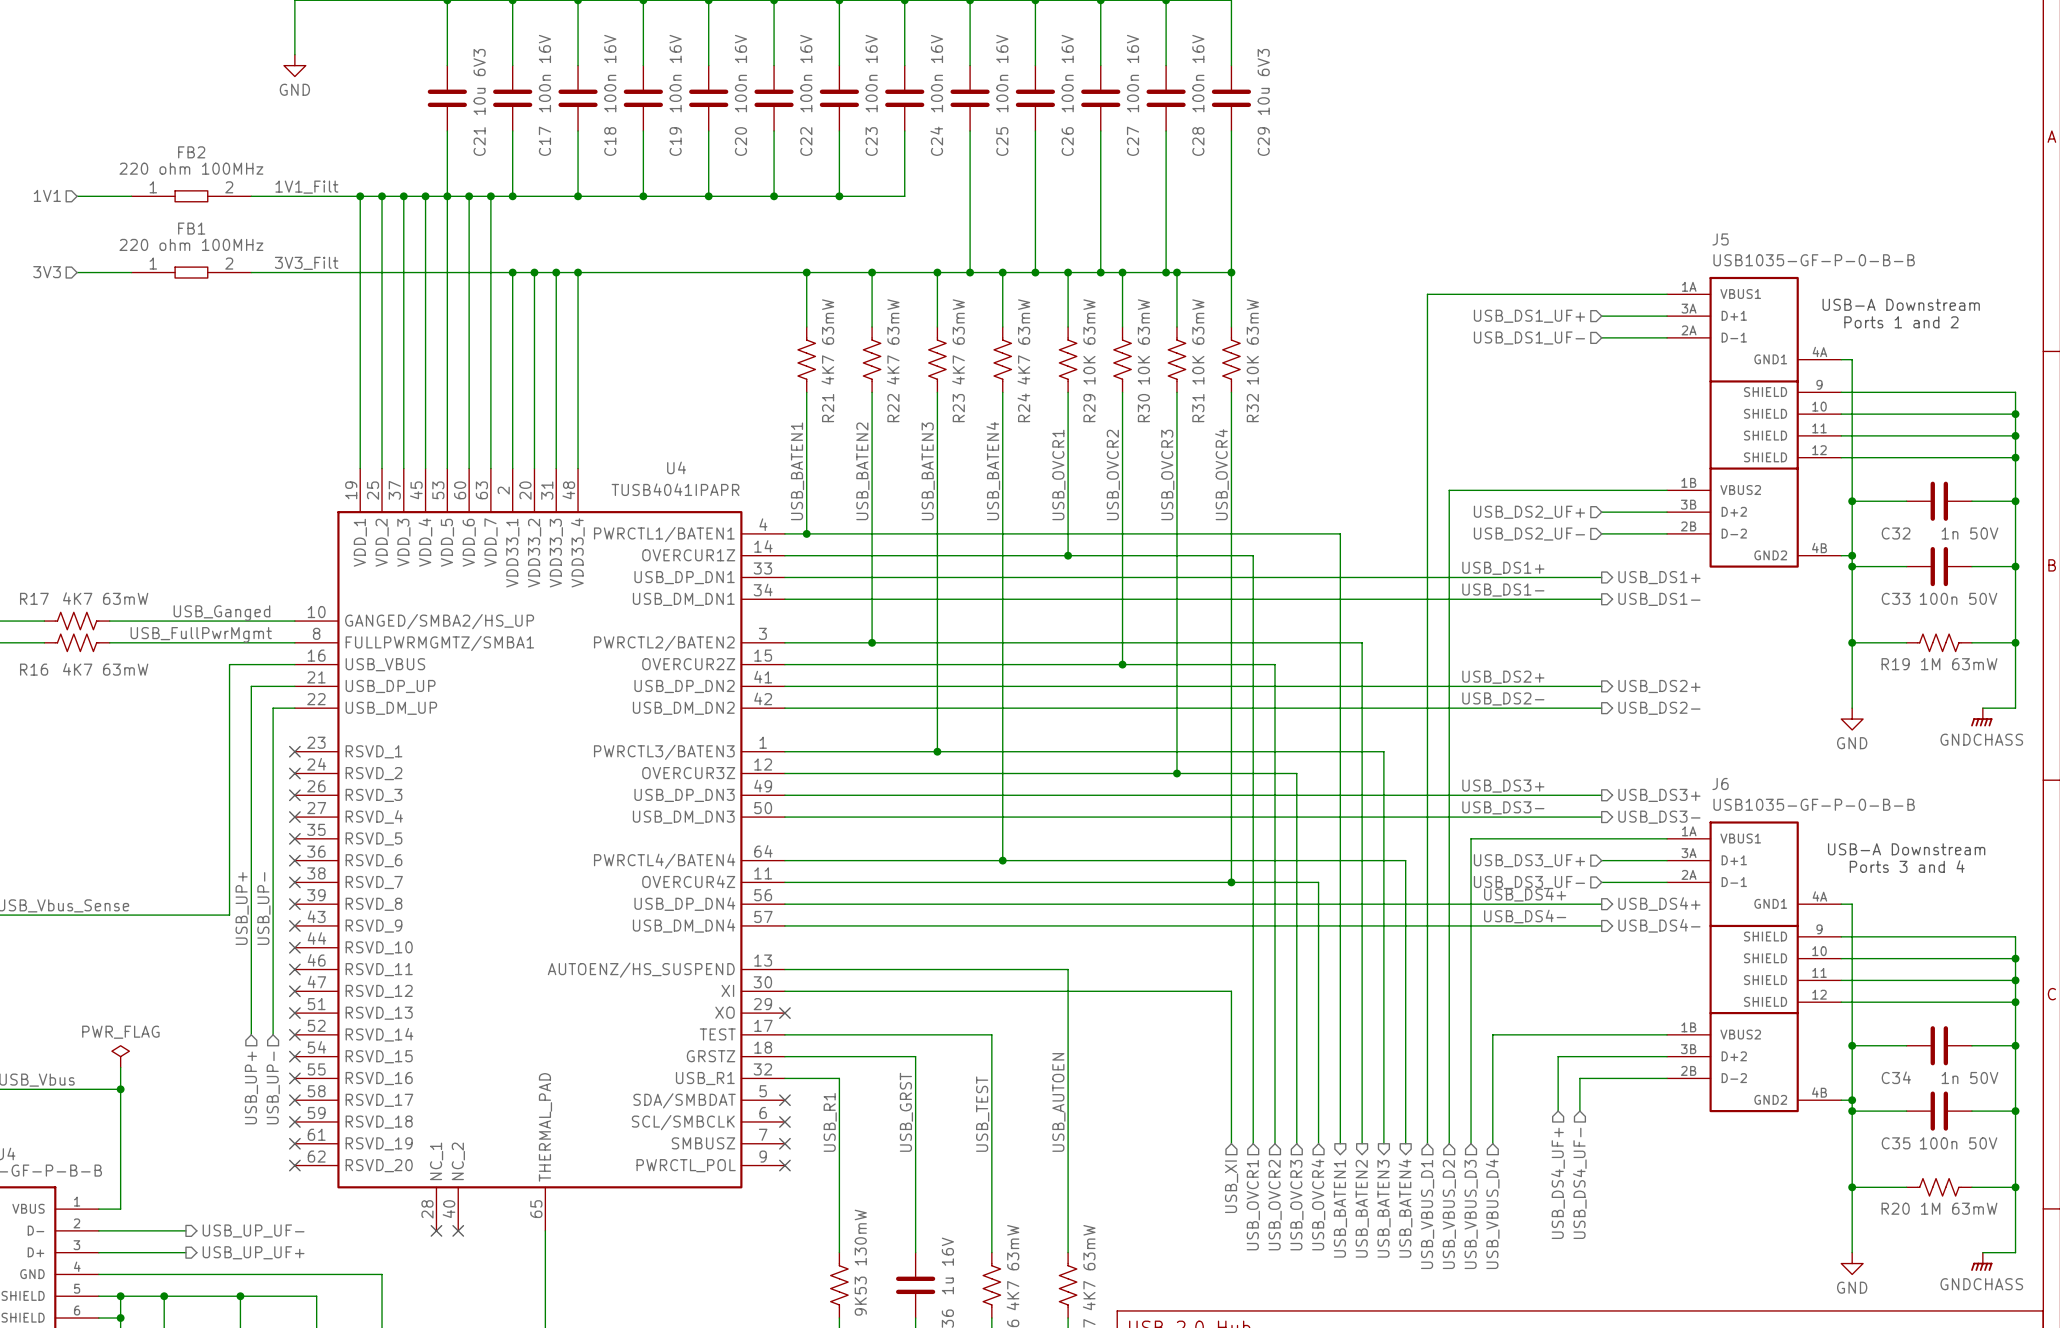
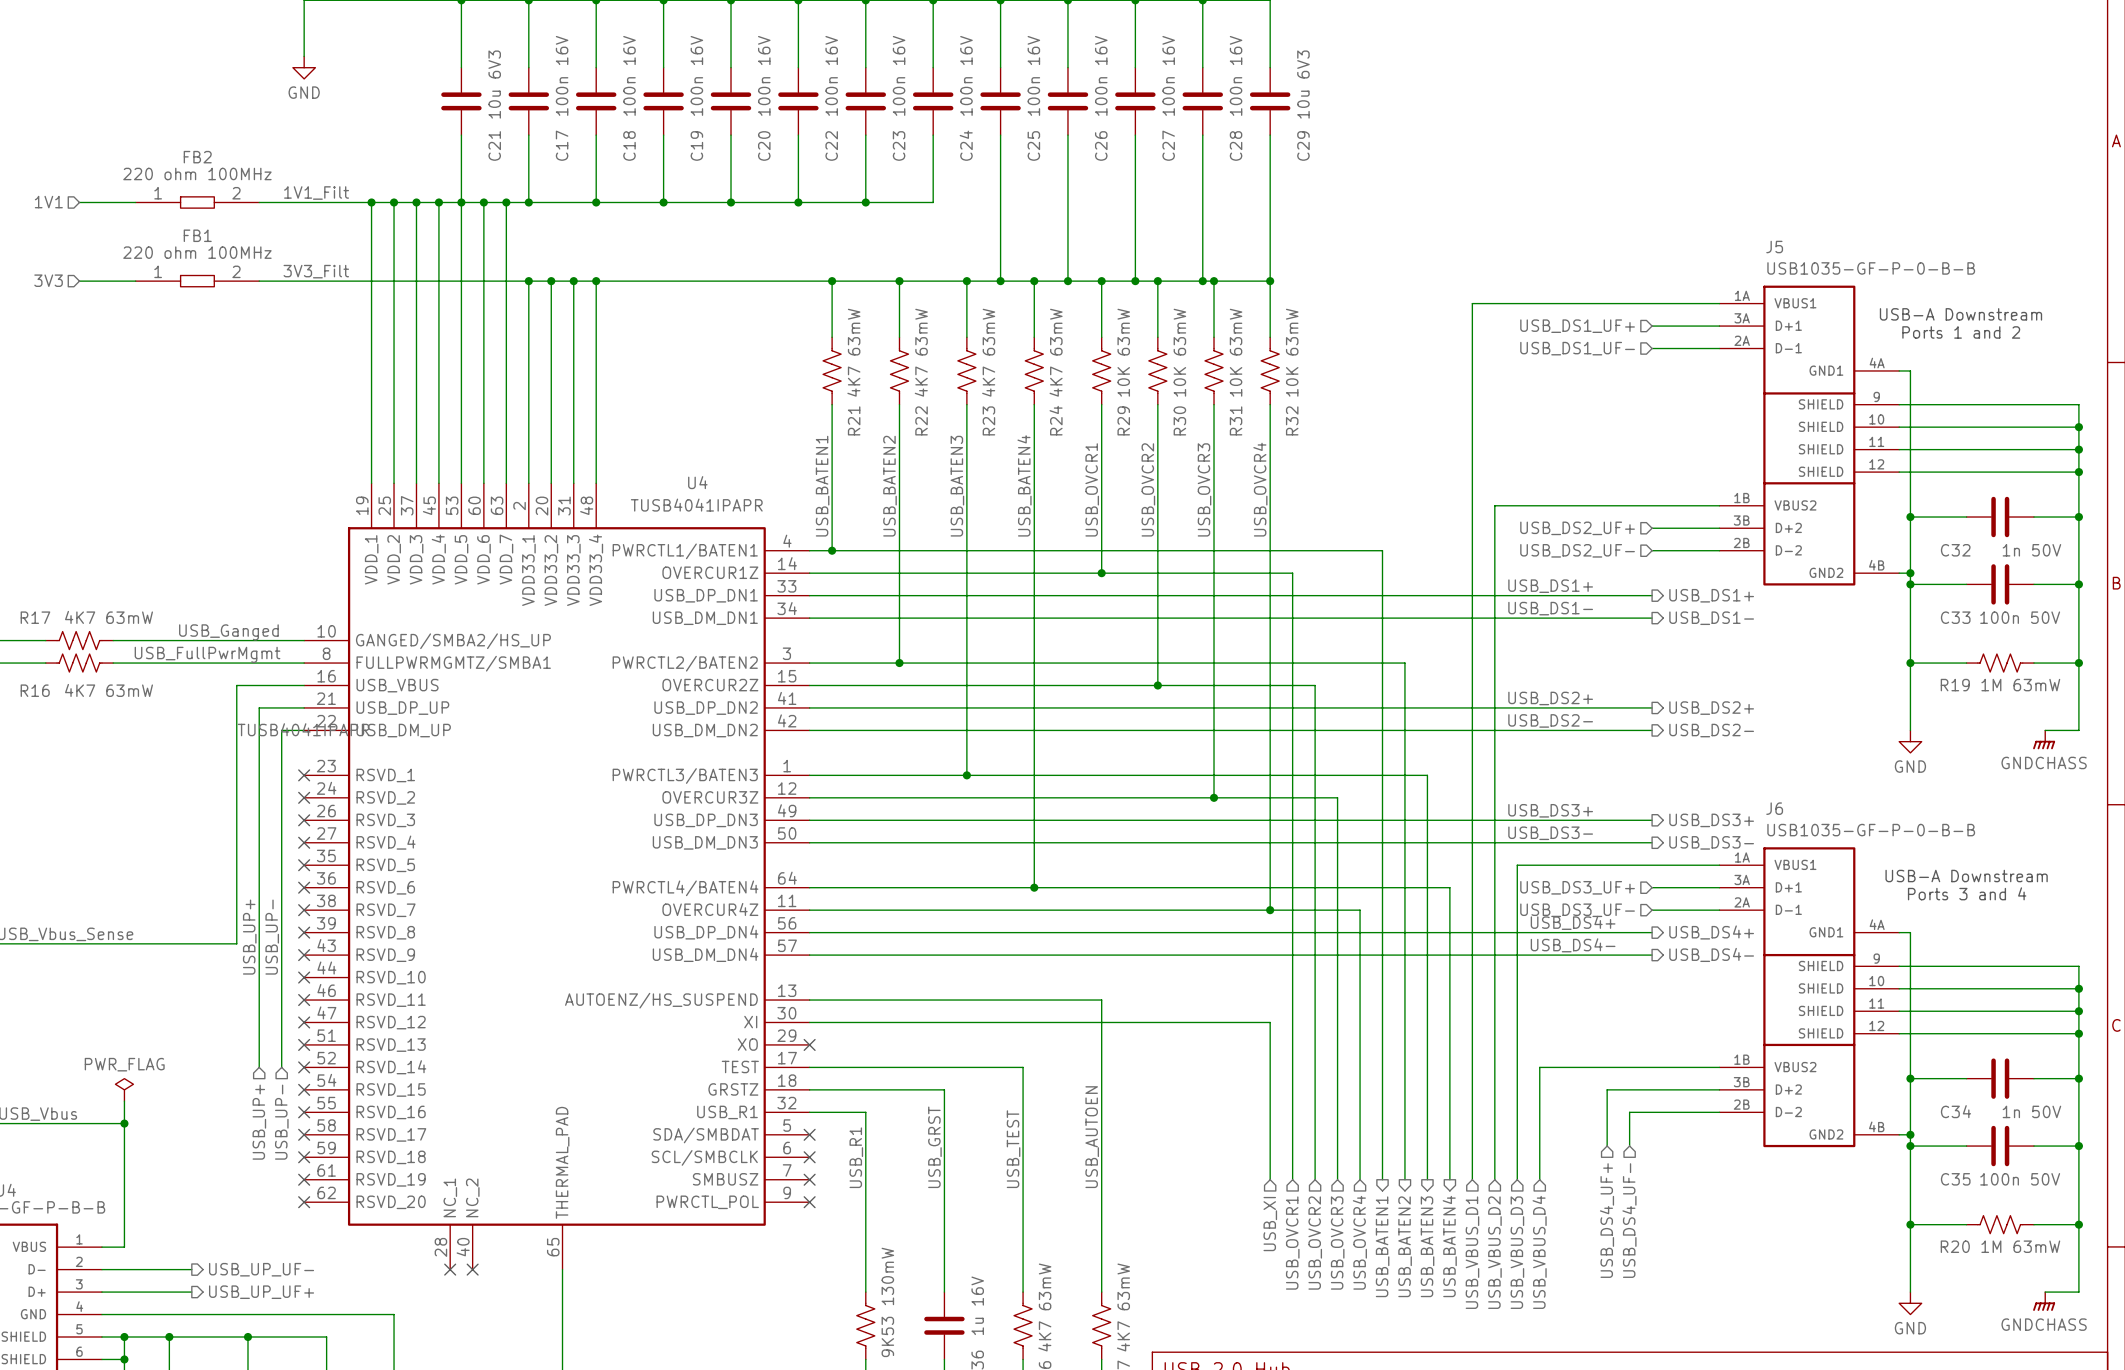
U4 text: none -> TUSB4041IPAPR (303, 729)

